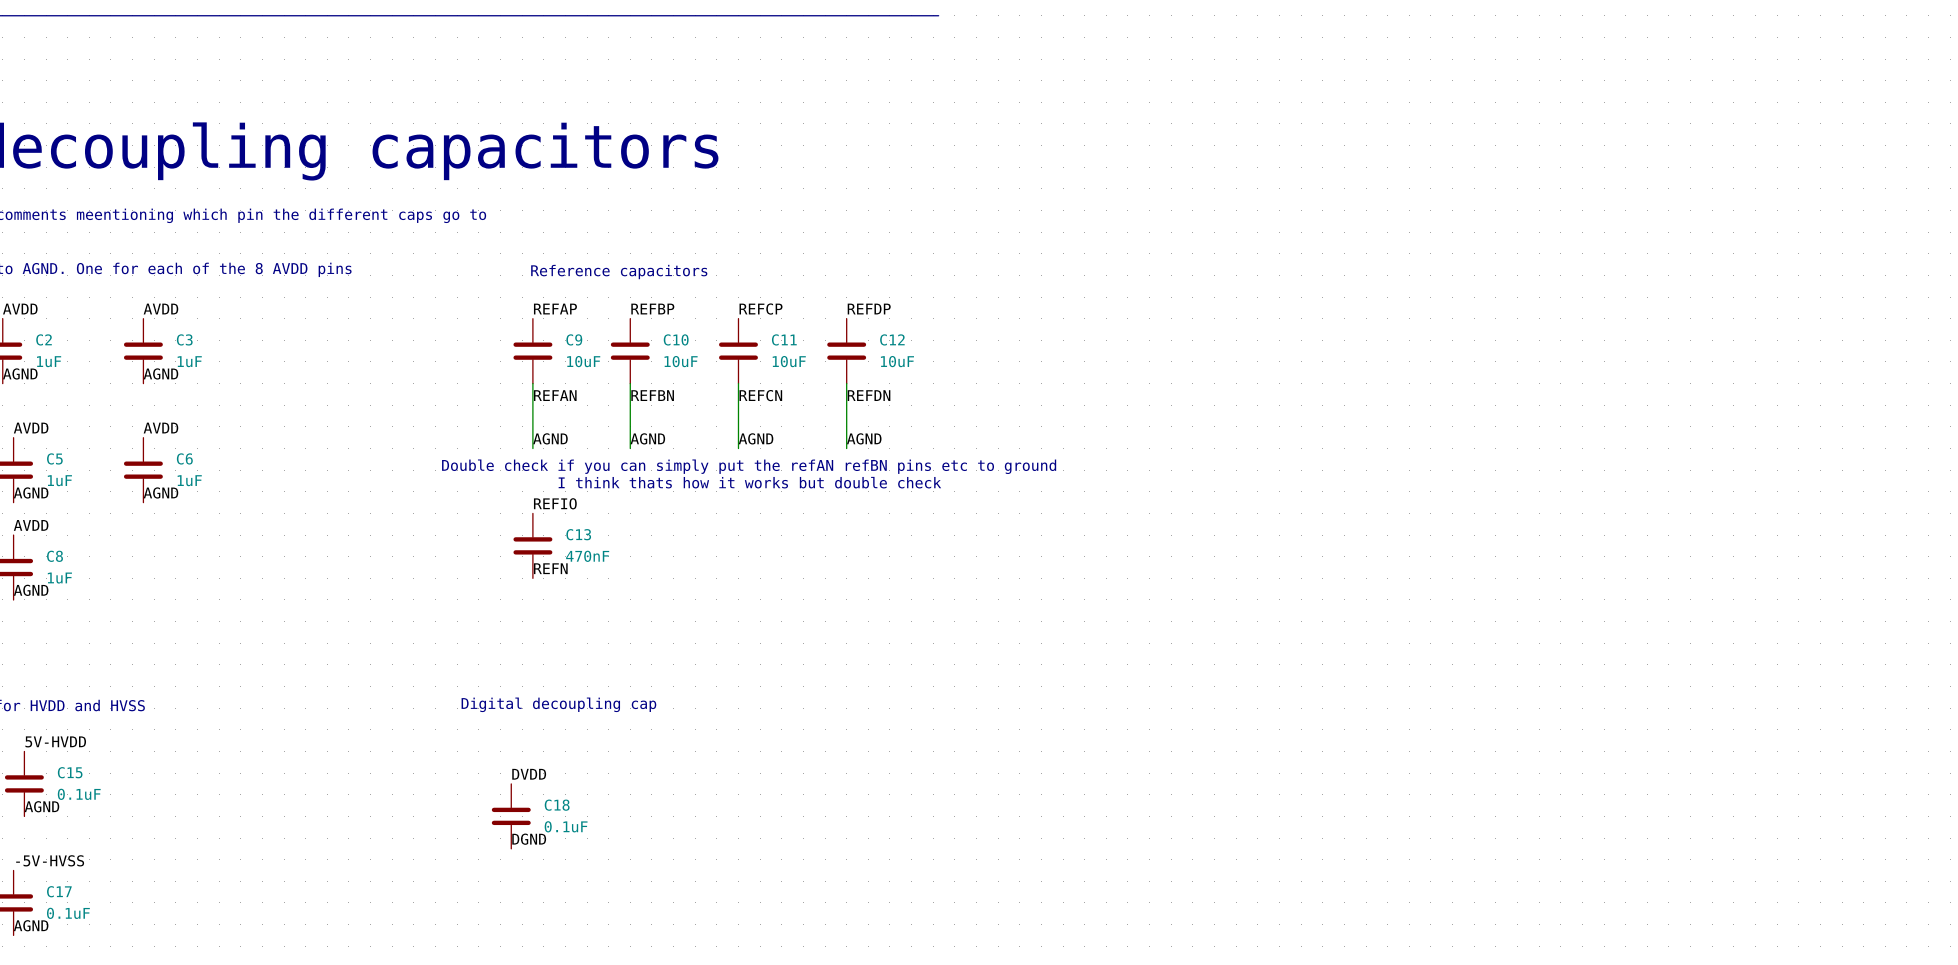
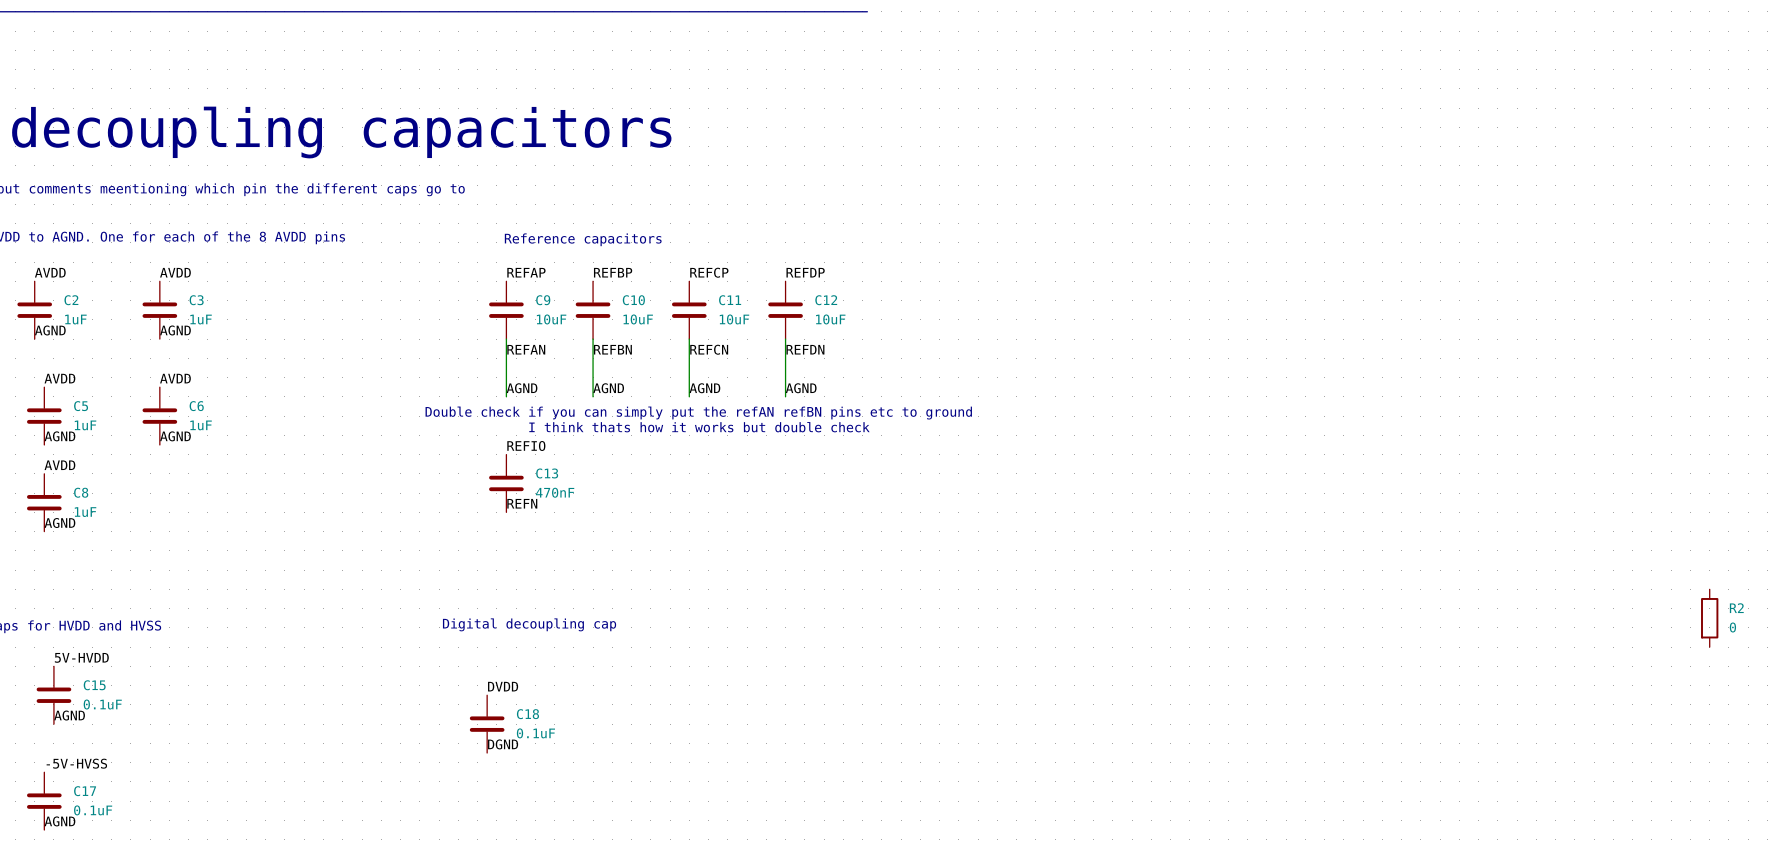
R2: none -> 0 (1709, 618)

